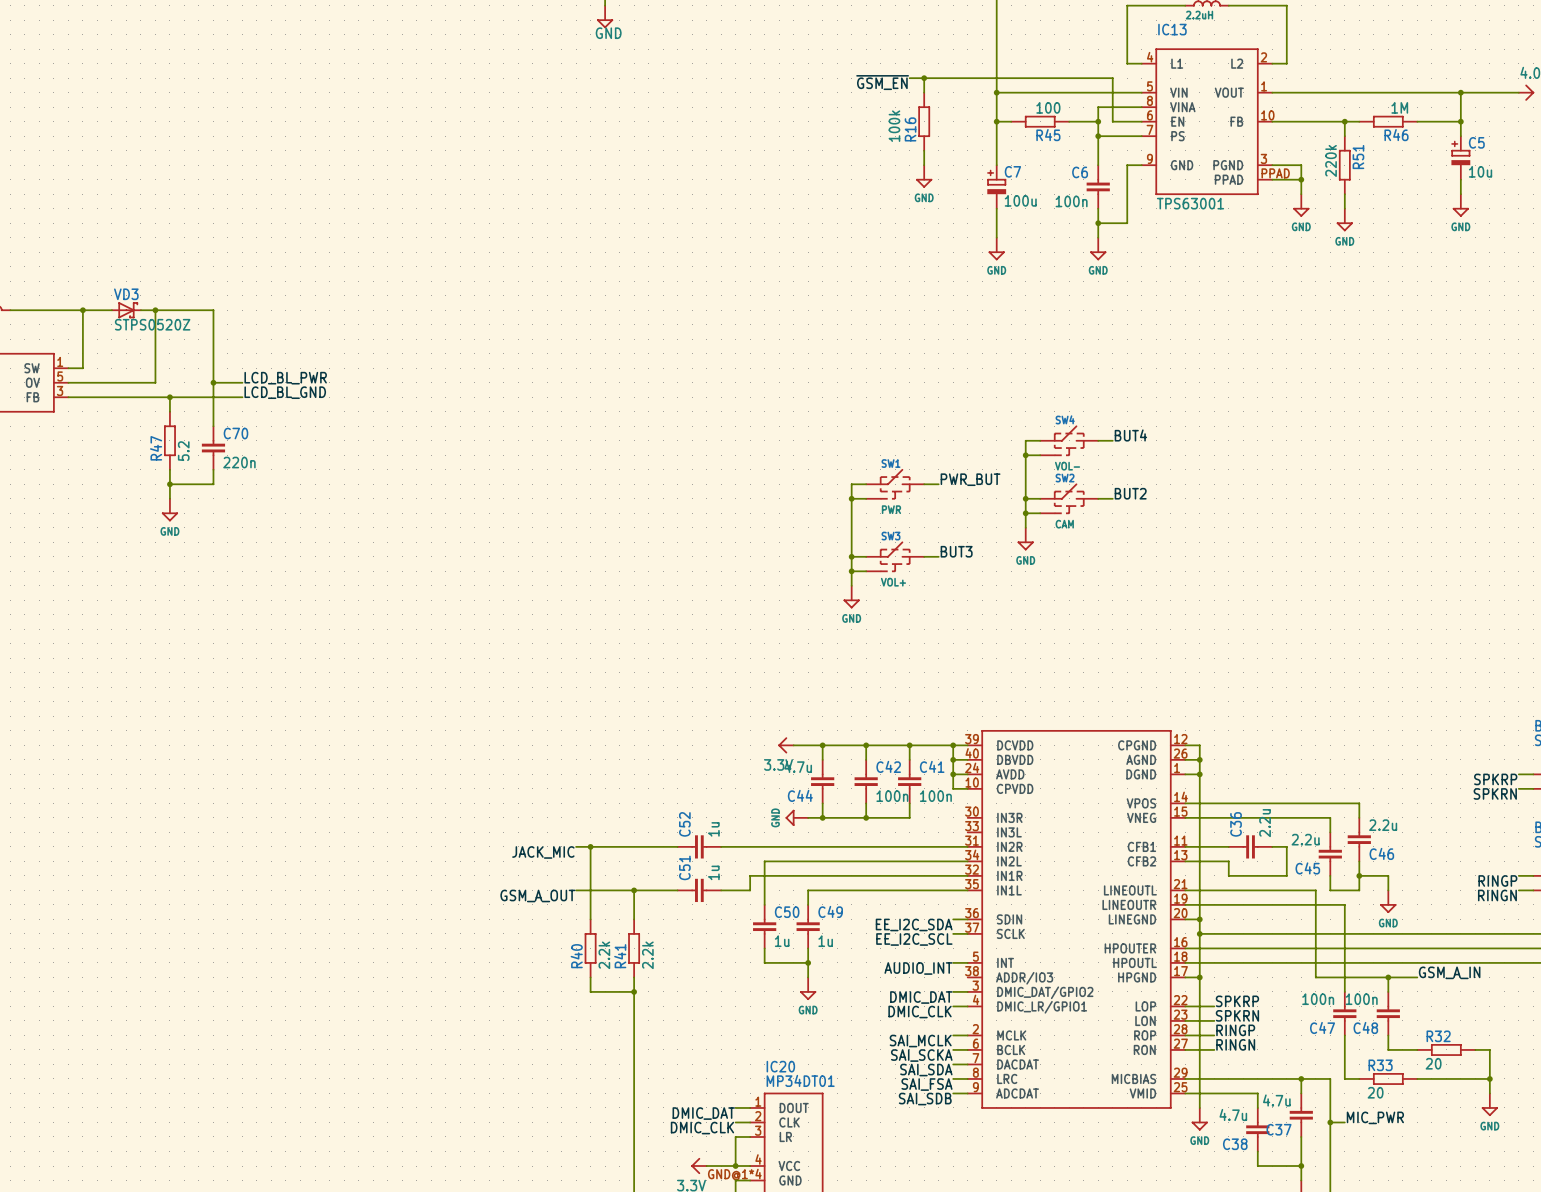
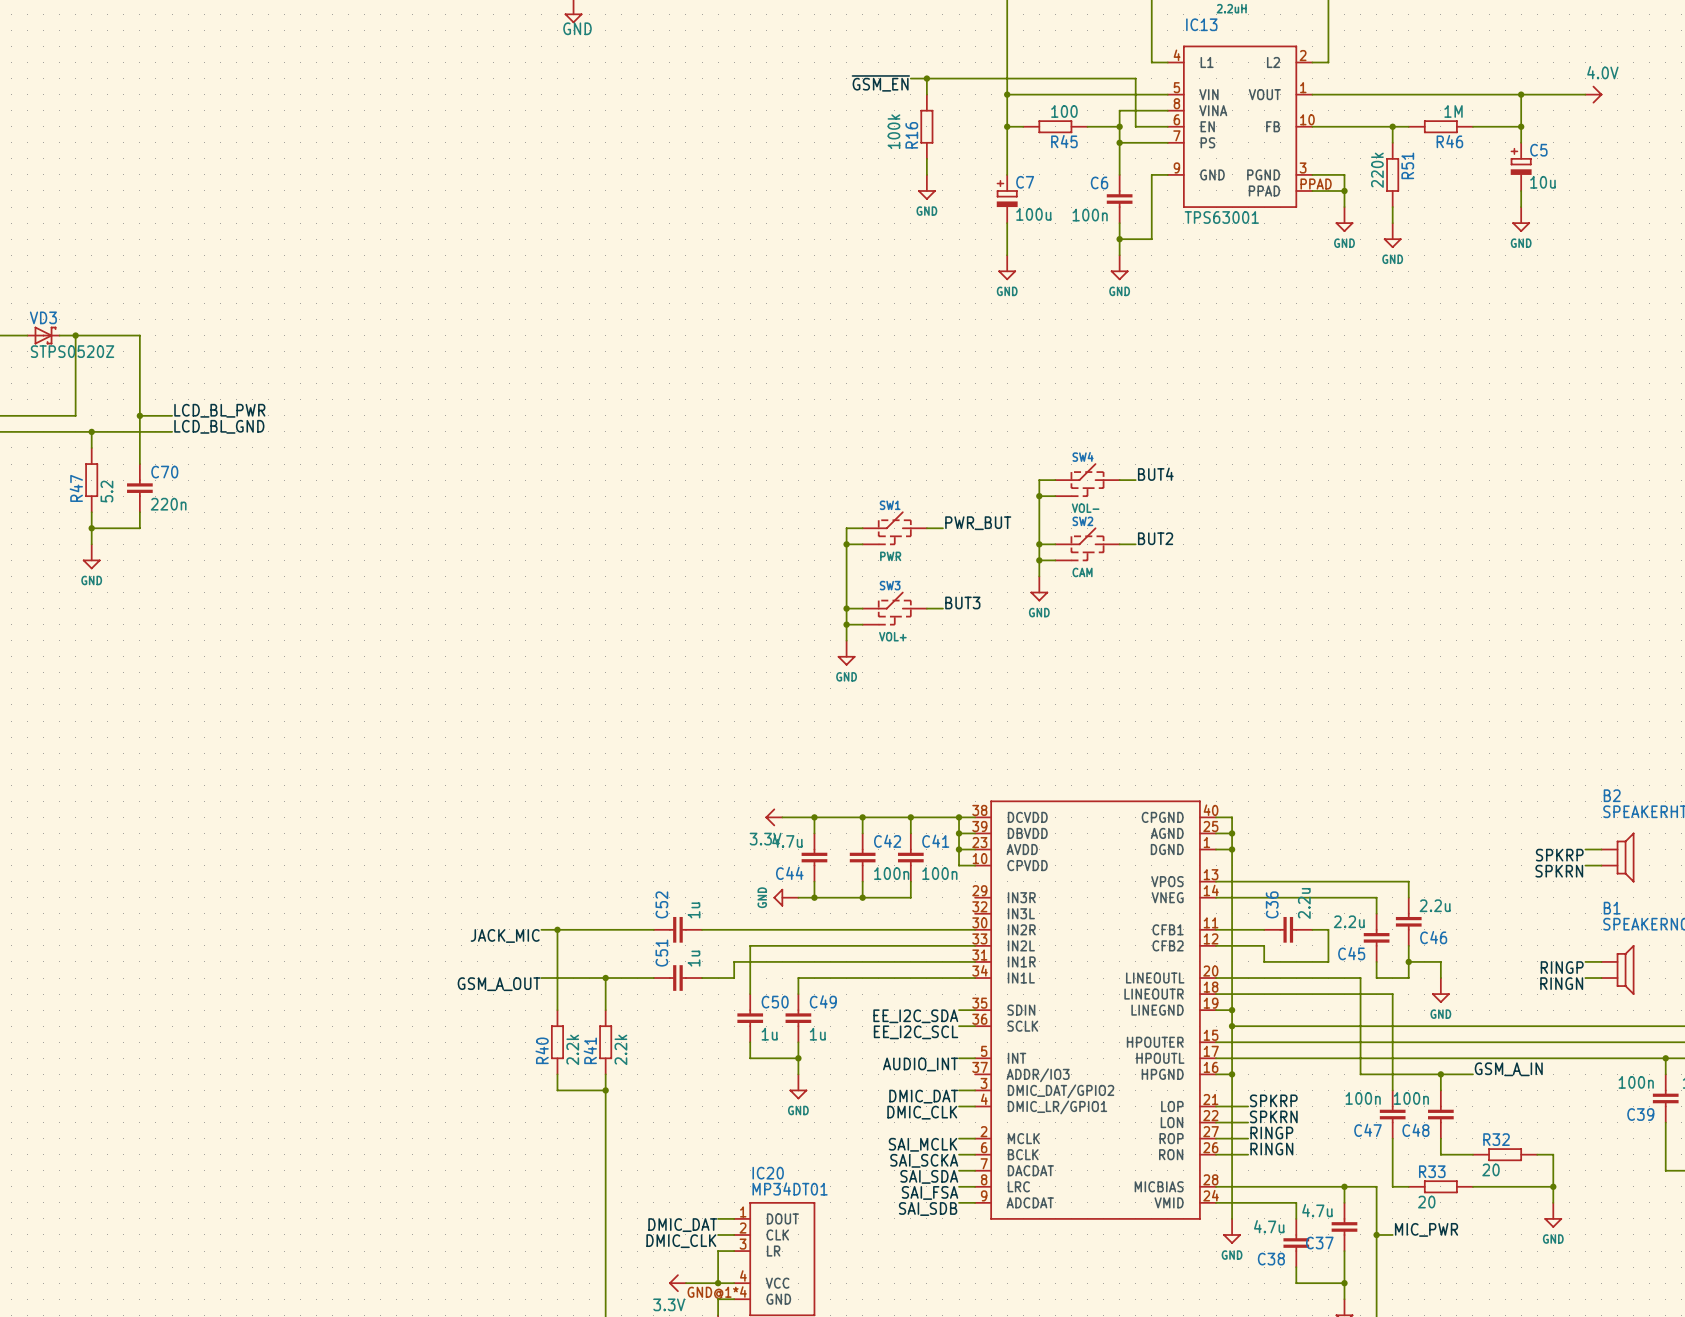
part symbol: [967, 730, 1186, 1109] -> [975, 800, 1217, 1220]

